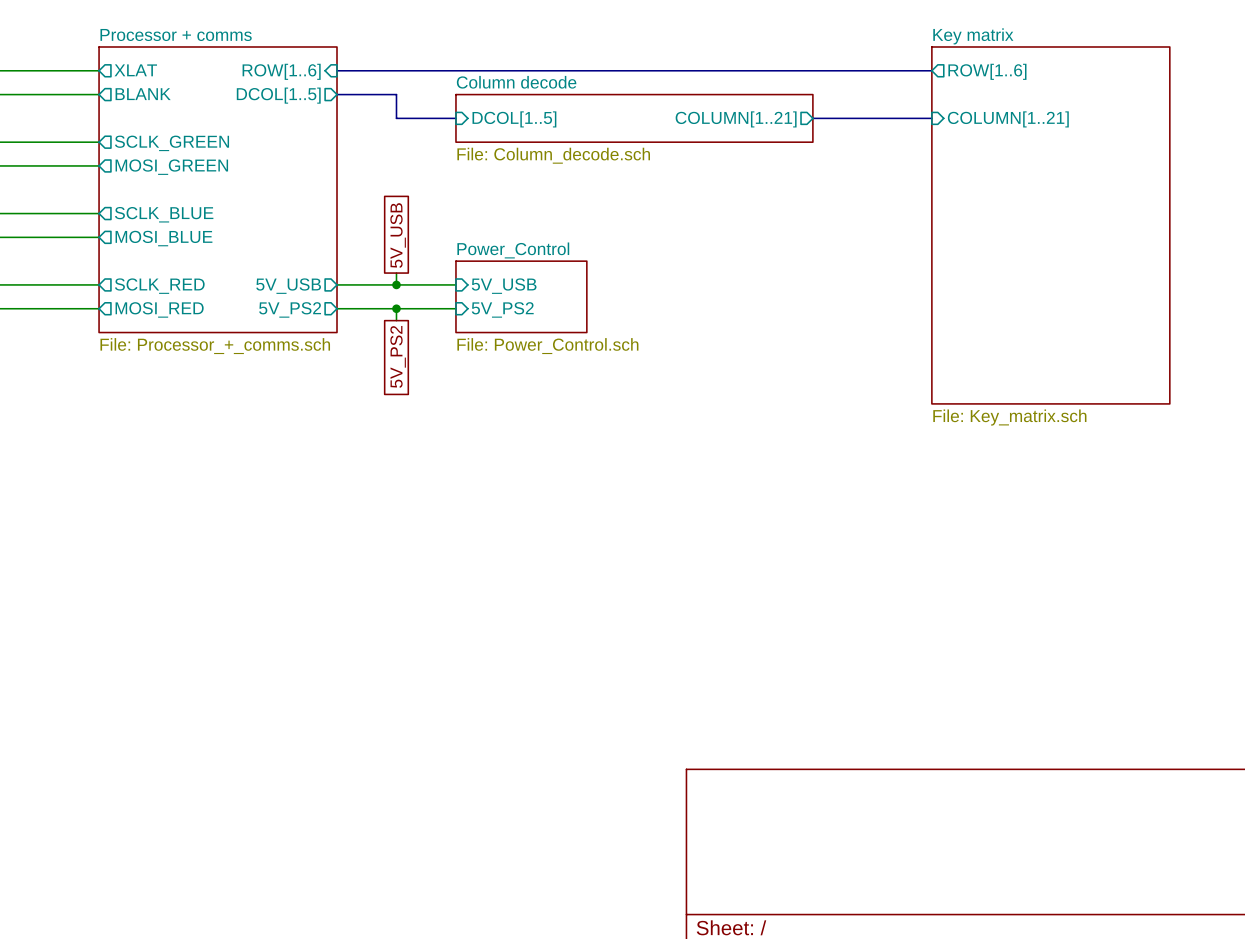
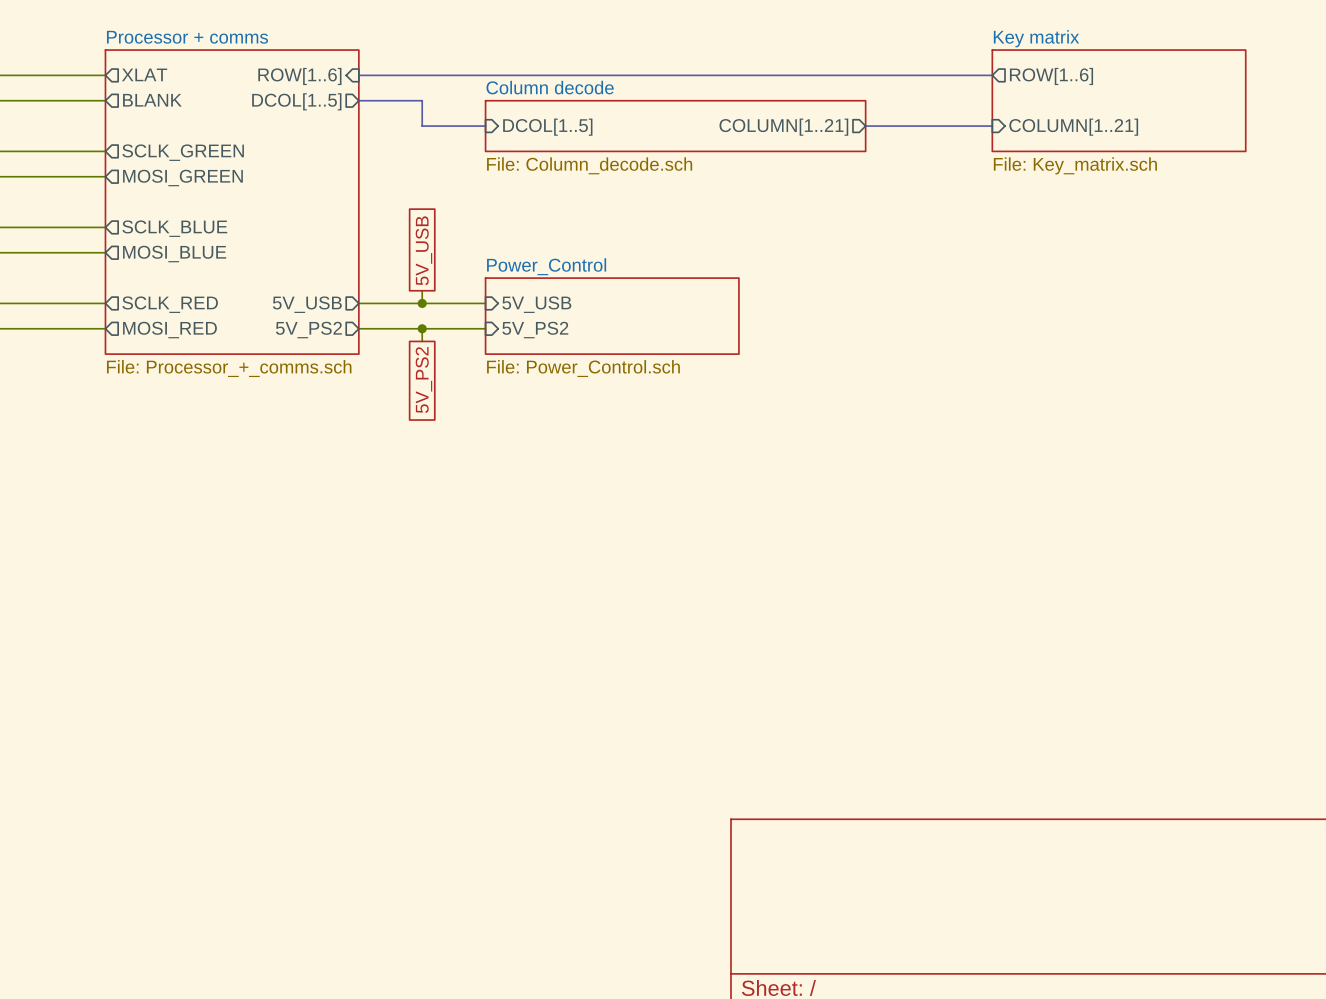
sheet Key matrix: none -> File: Key_matrix.sch (1119, 100)
sheet Key matrix: File: Key_matrix.sch (1050, 225) -> none
sheet Power_Control: File: Power_Control.sch (521, 296) -> none
sheet Power_Control: none -> File: Power_Control.sch (612, 316)

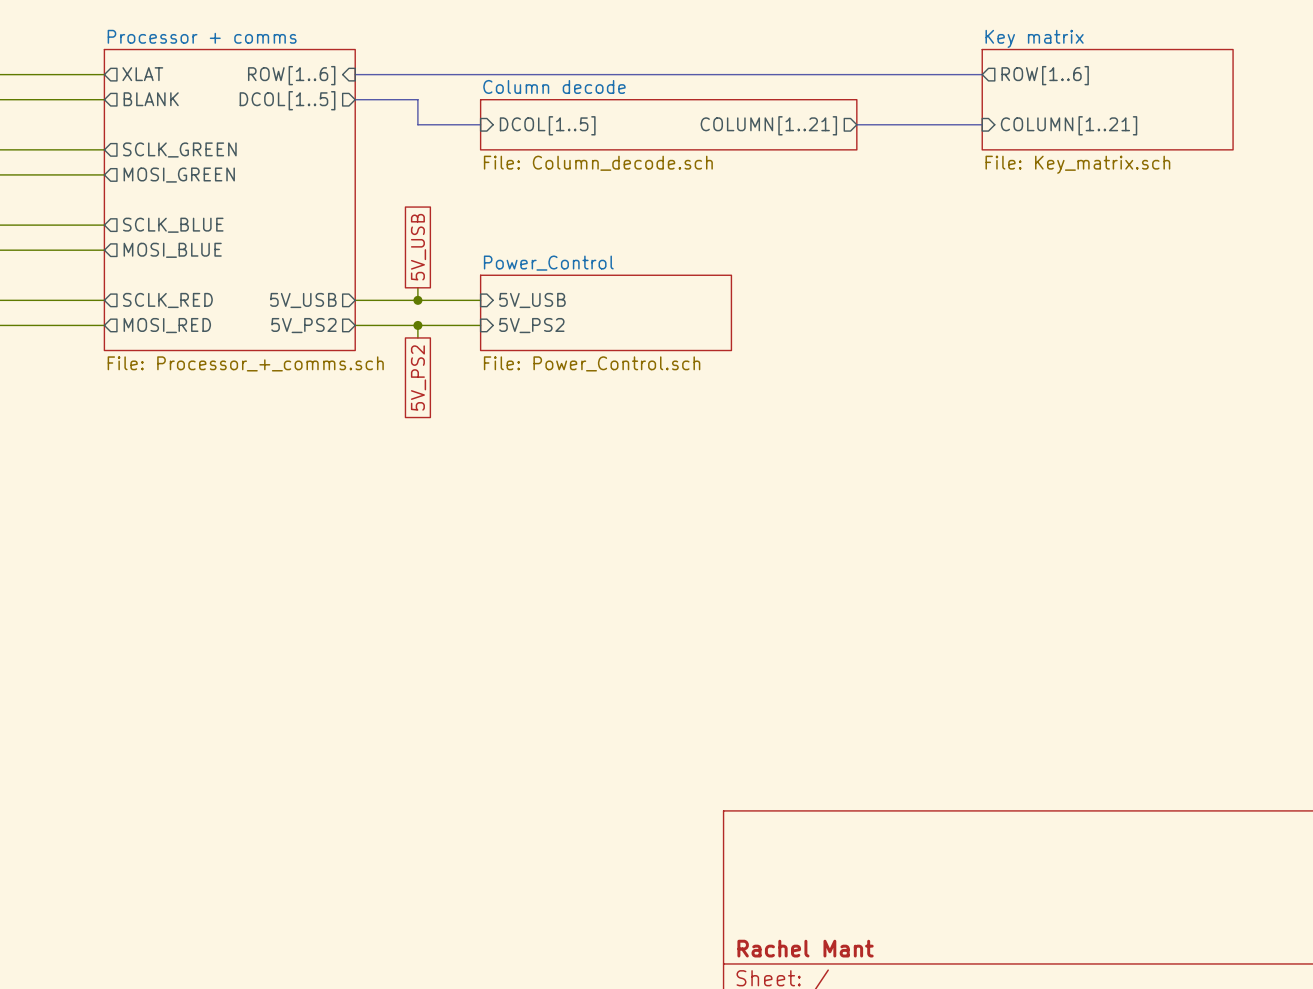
title block: none -> Rachel Mant (805, 948)

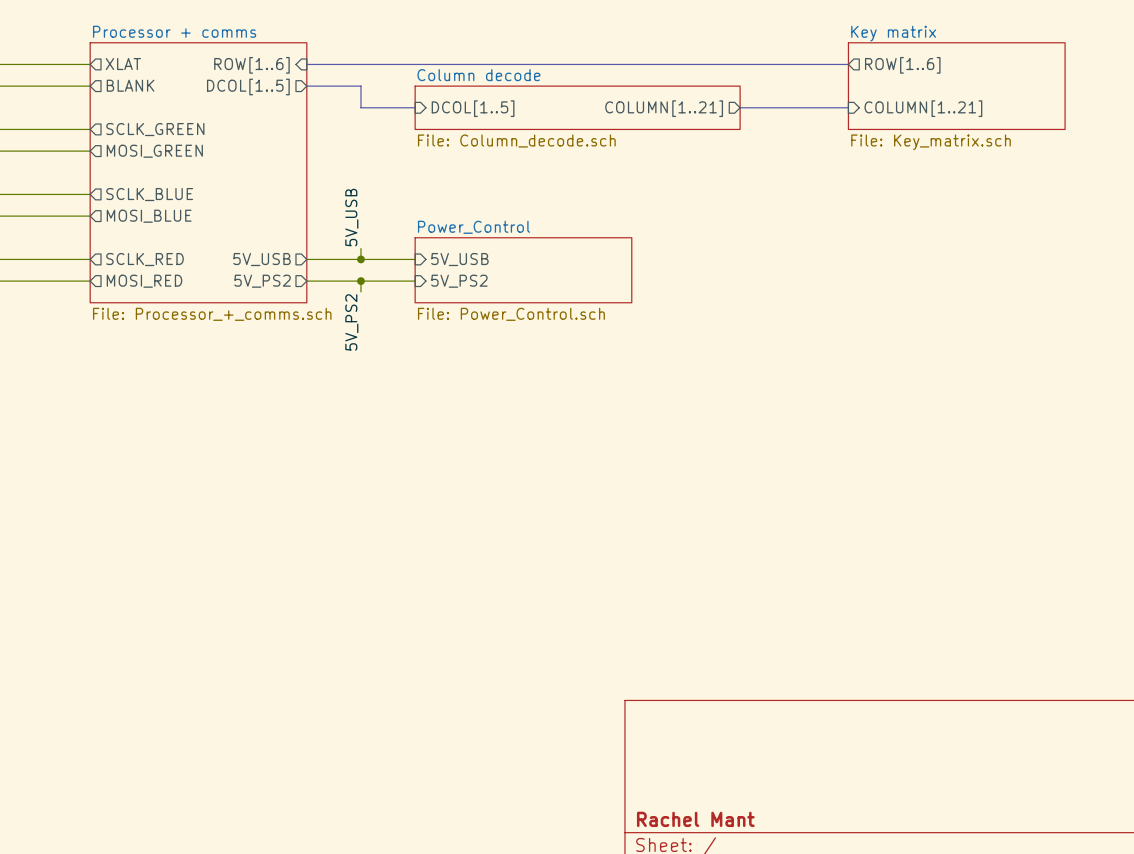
global label: 5V_USB (418, 247) -> none
label: none -> 5V_USB (351, 217)
label: none -> 5V_PS2 (351, 322)
global label: 5V_PS2 (418, 378) -> none

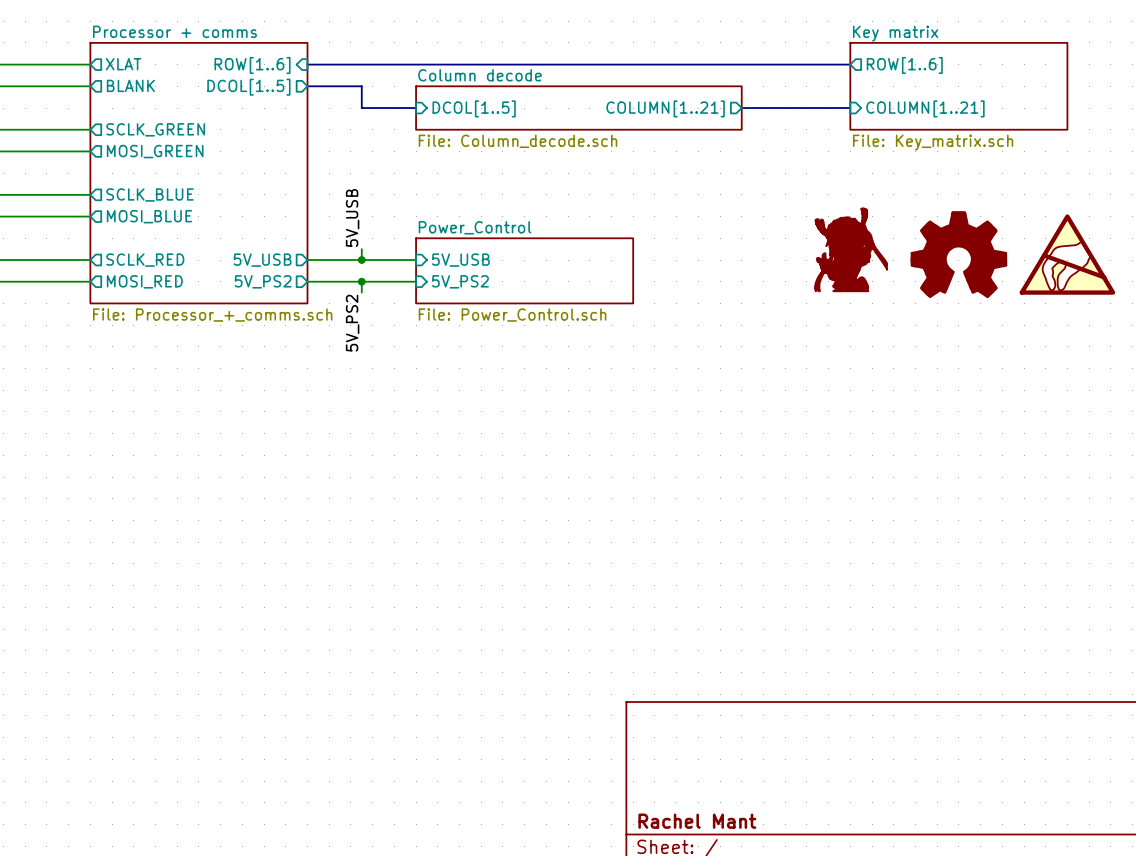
part: none -> (851, 249)
part: none -> (958, 254)
part: none -> (1067, 254)

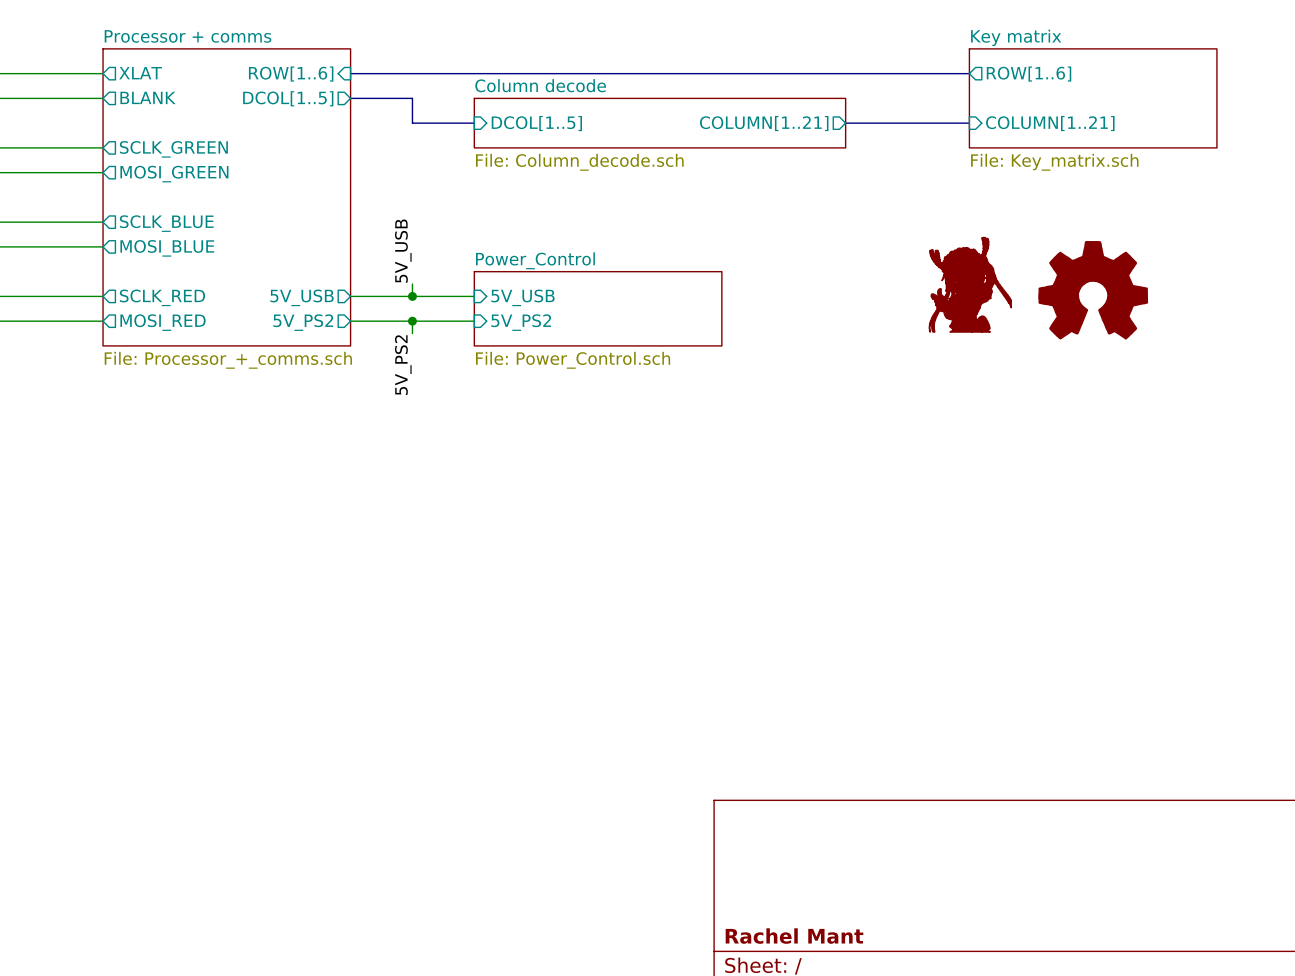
part: (1067, 254) -> none

